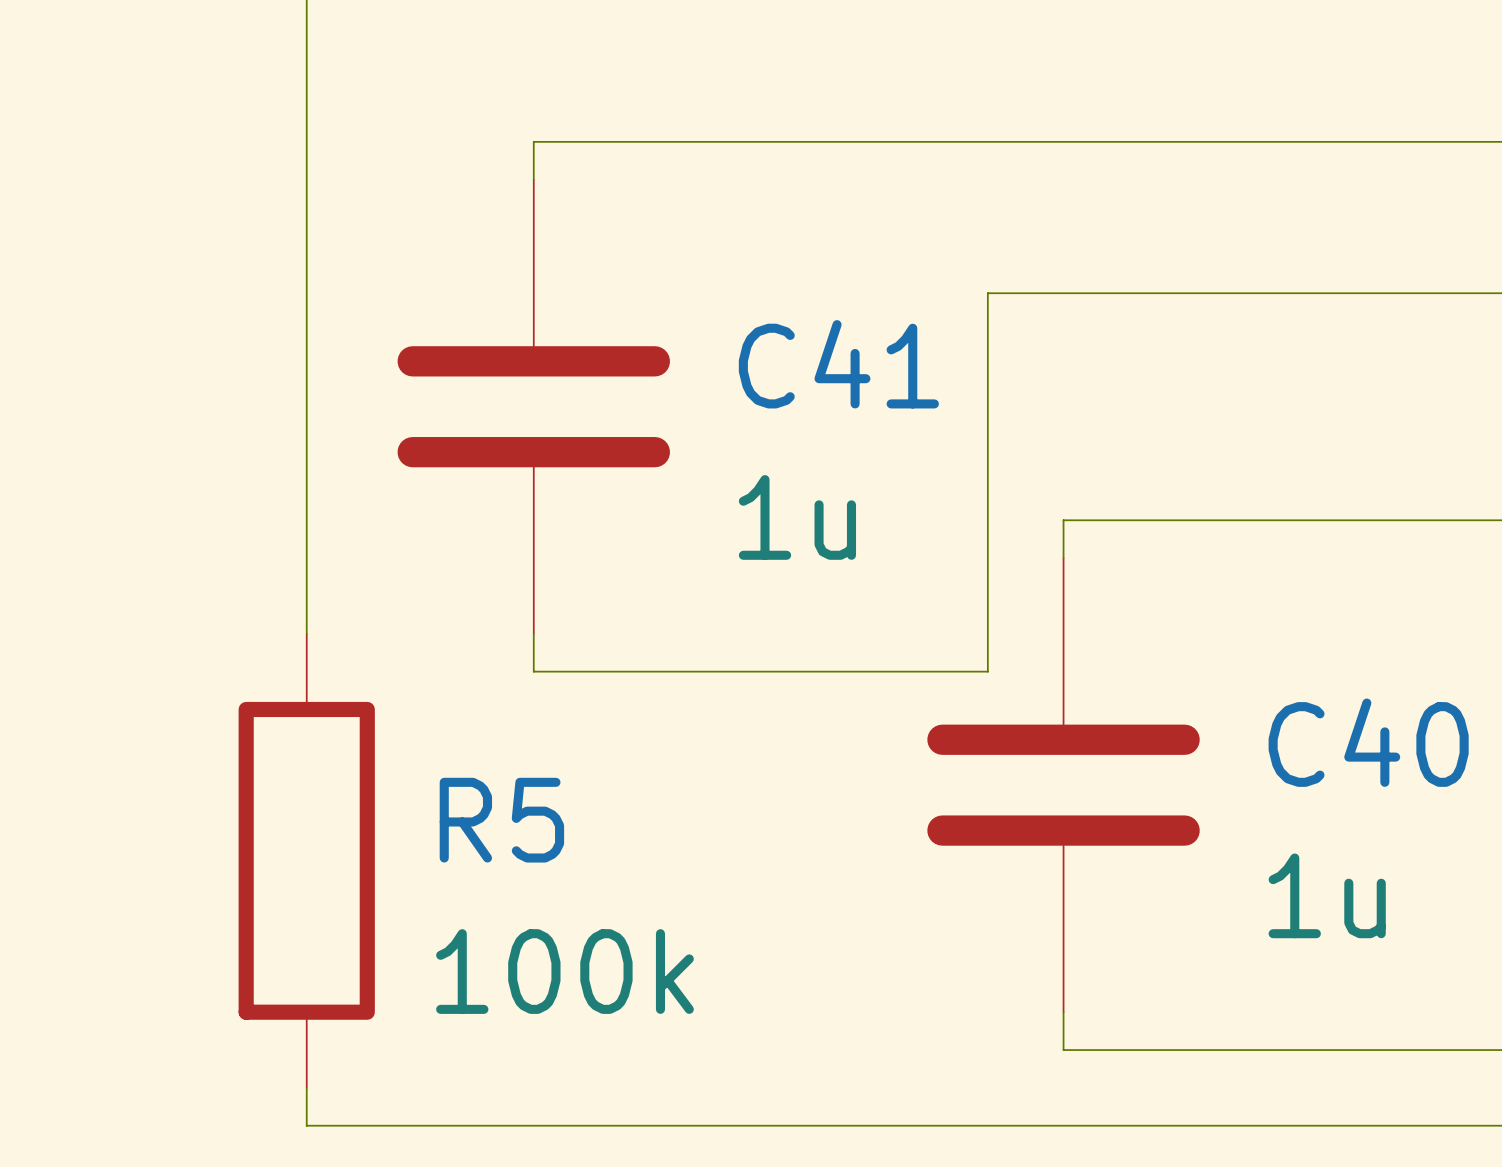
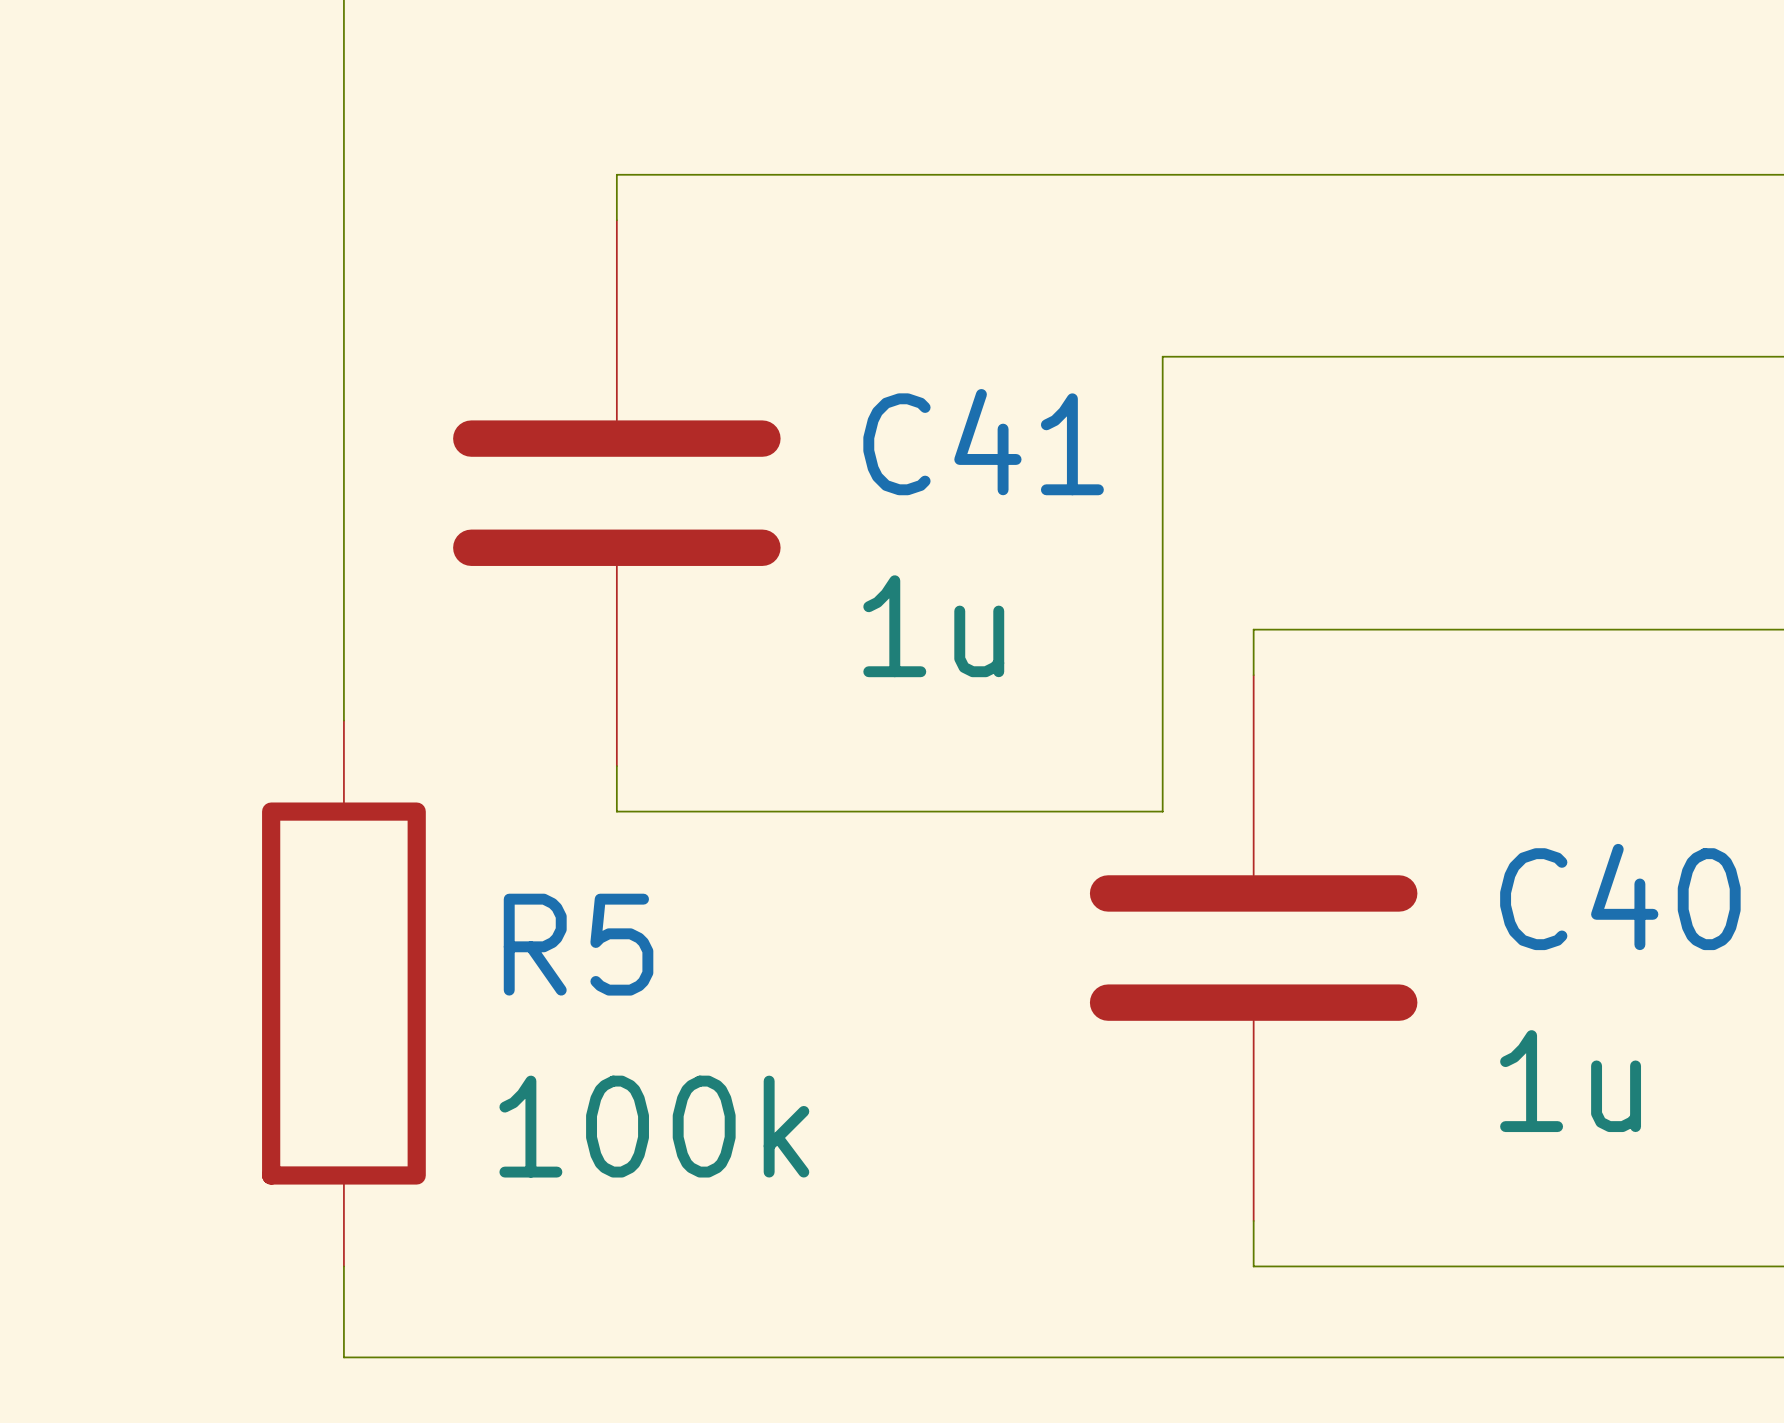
R5 position: (306, 860) -> (343, 993)

